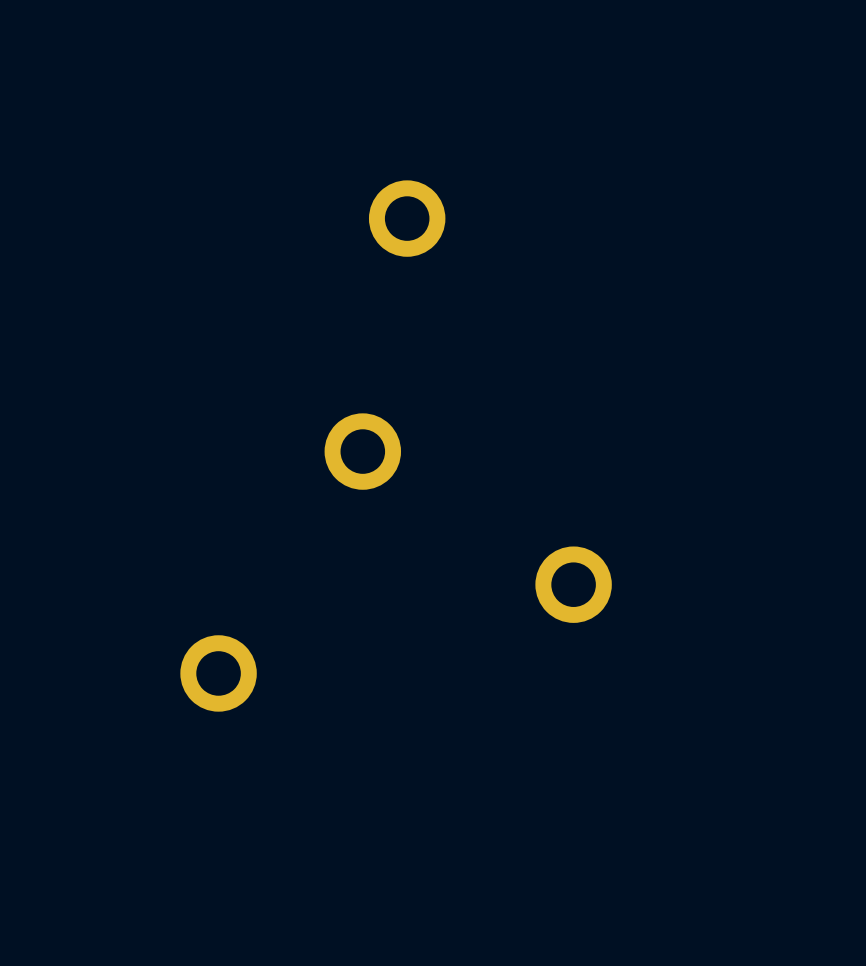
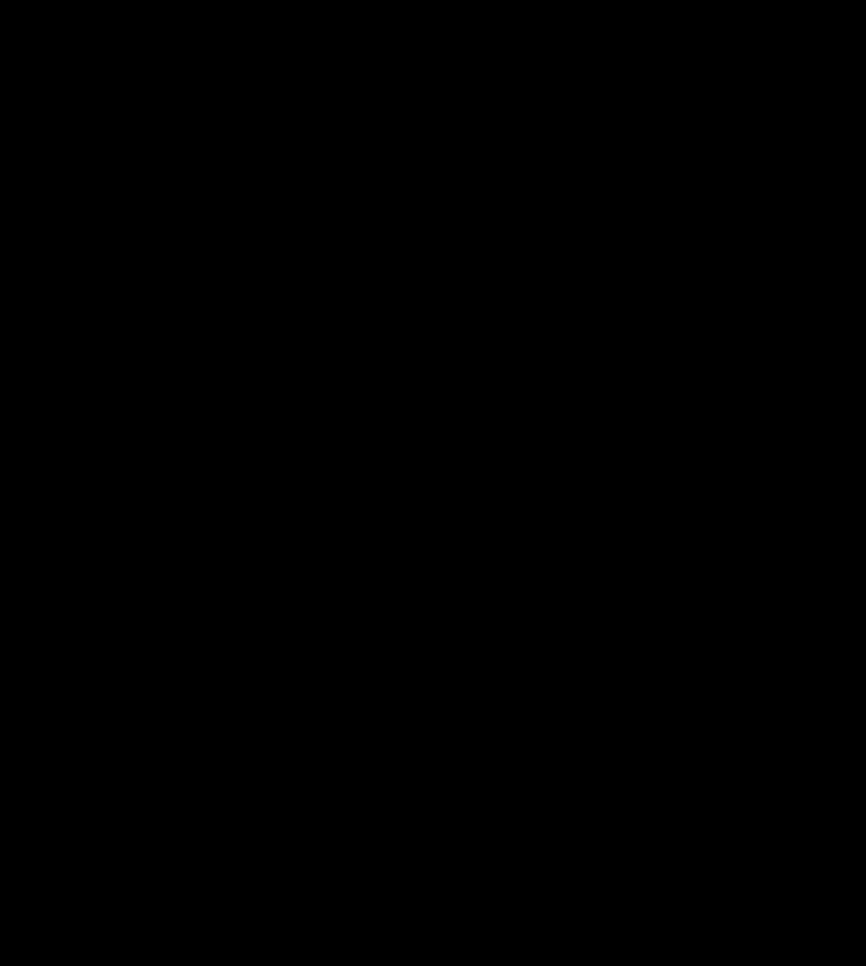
part: (407, 218) -> none
part: (362, 451) -> none
part: (573, 584) -> none
part: (218, 673) -> none

